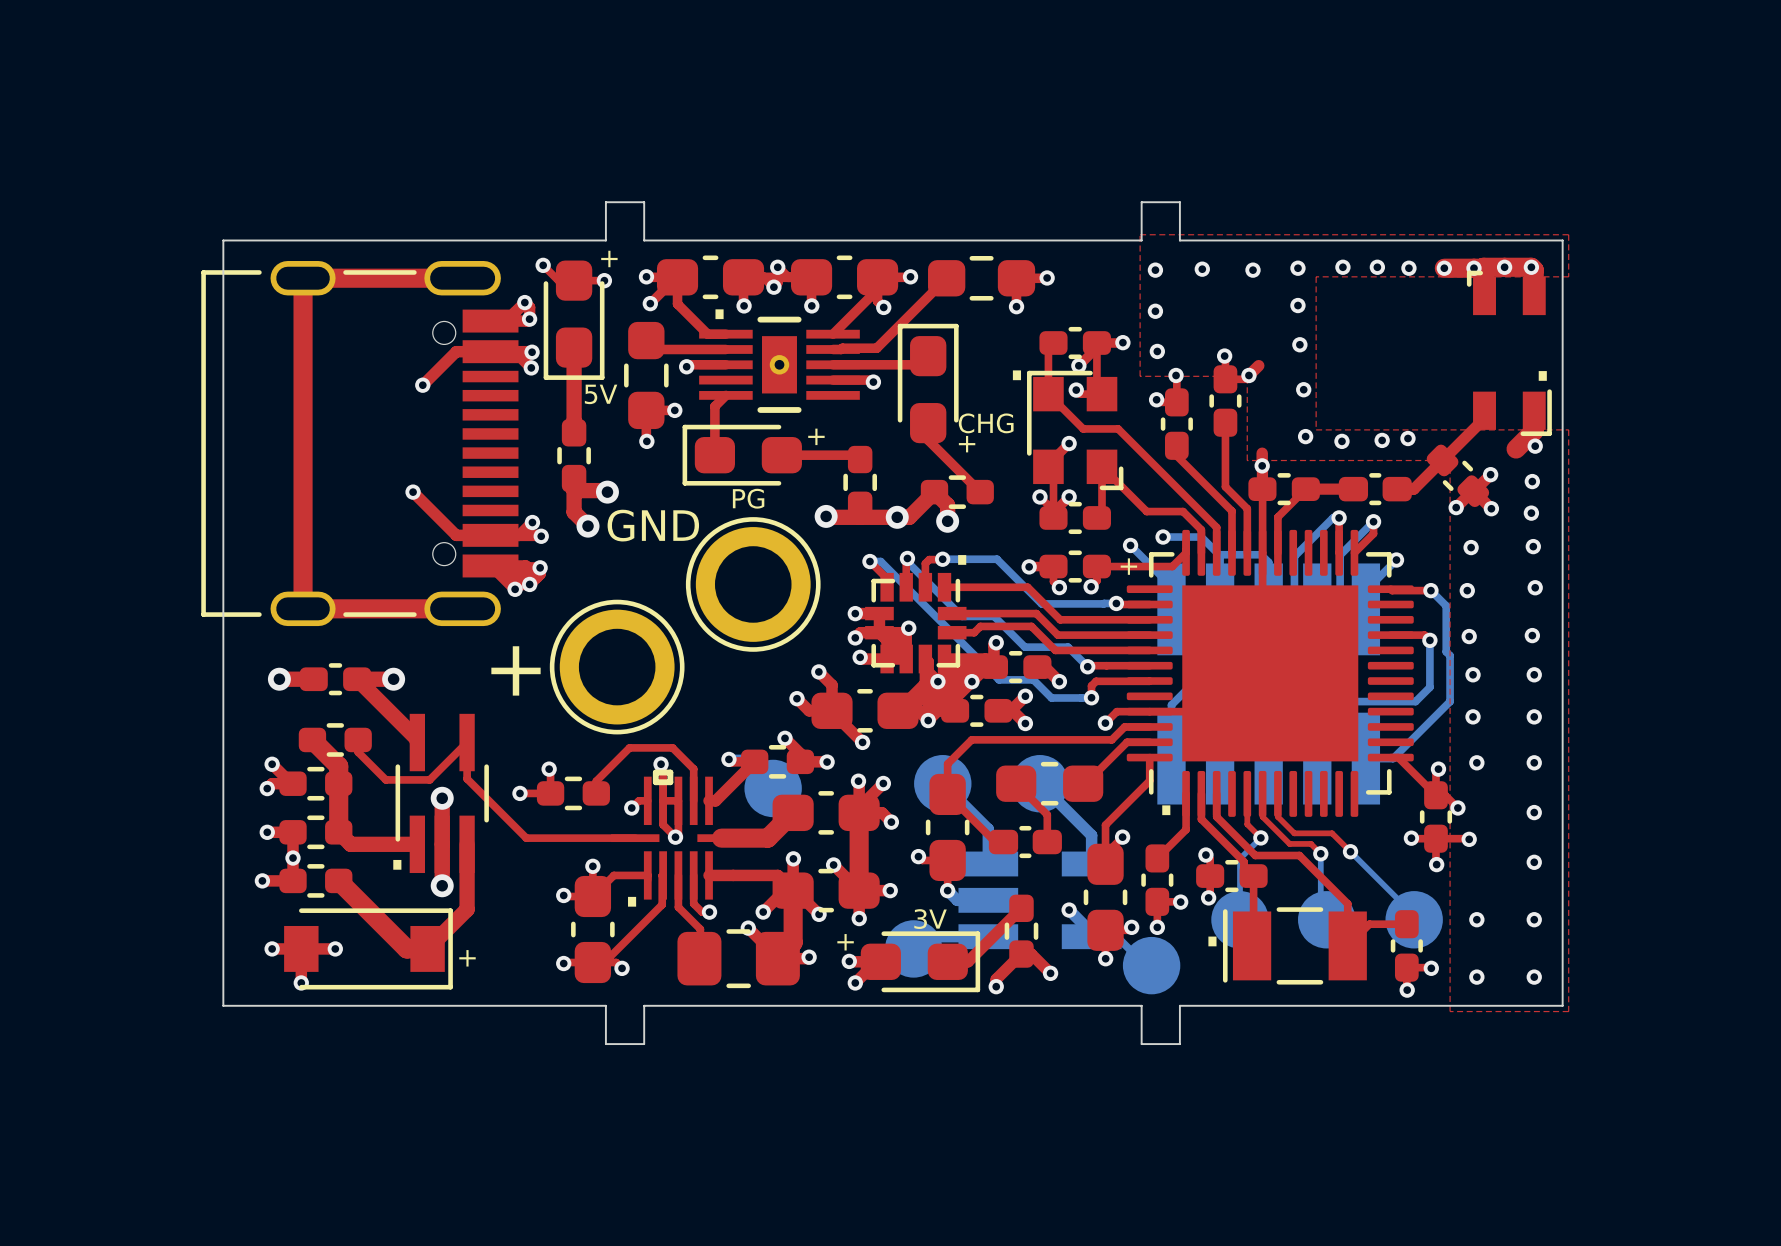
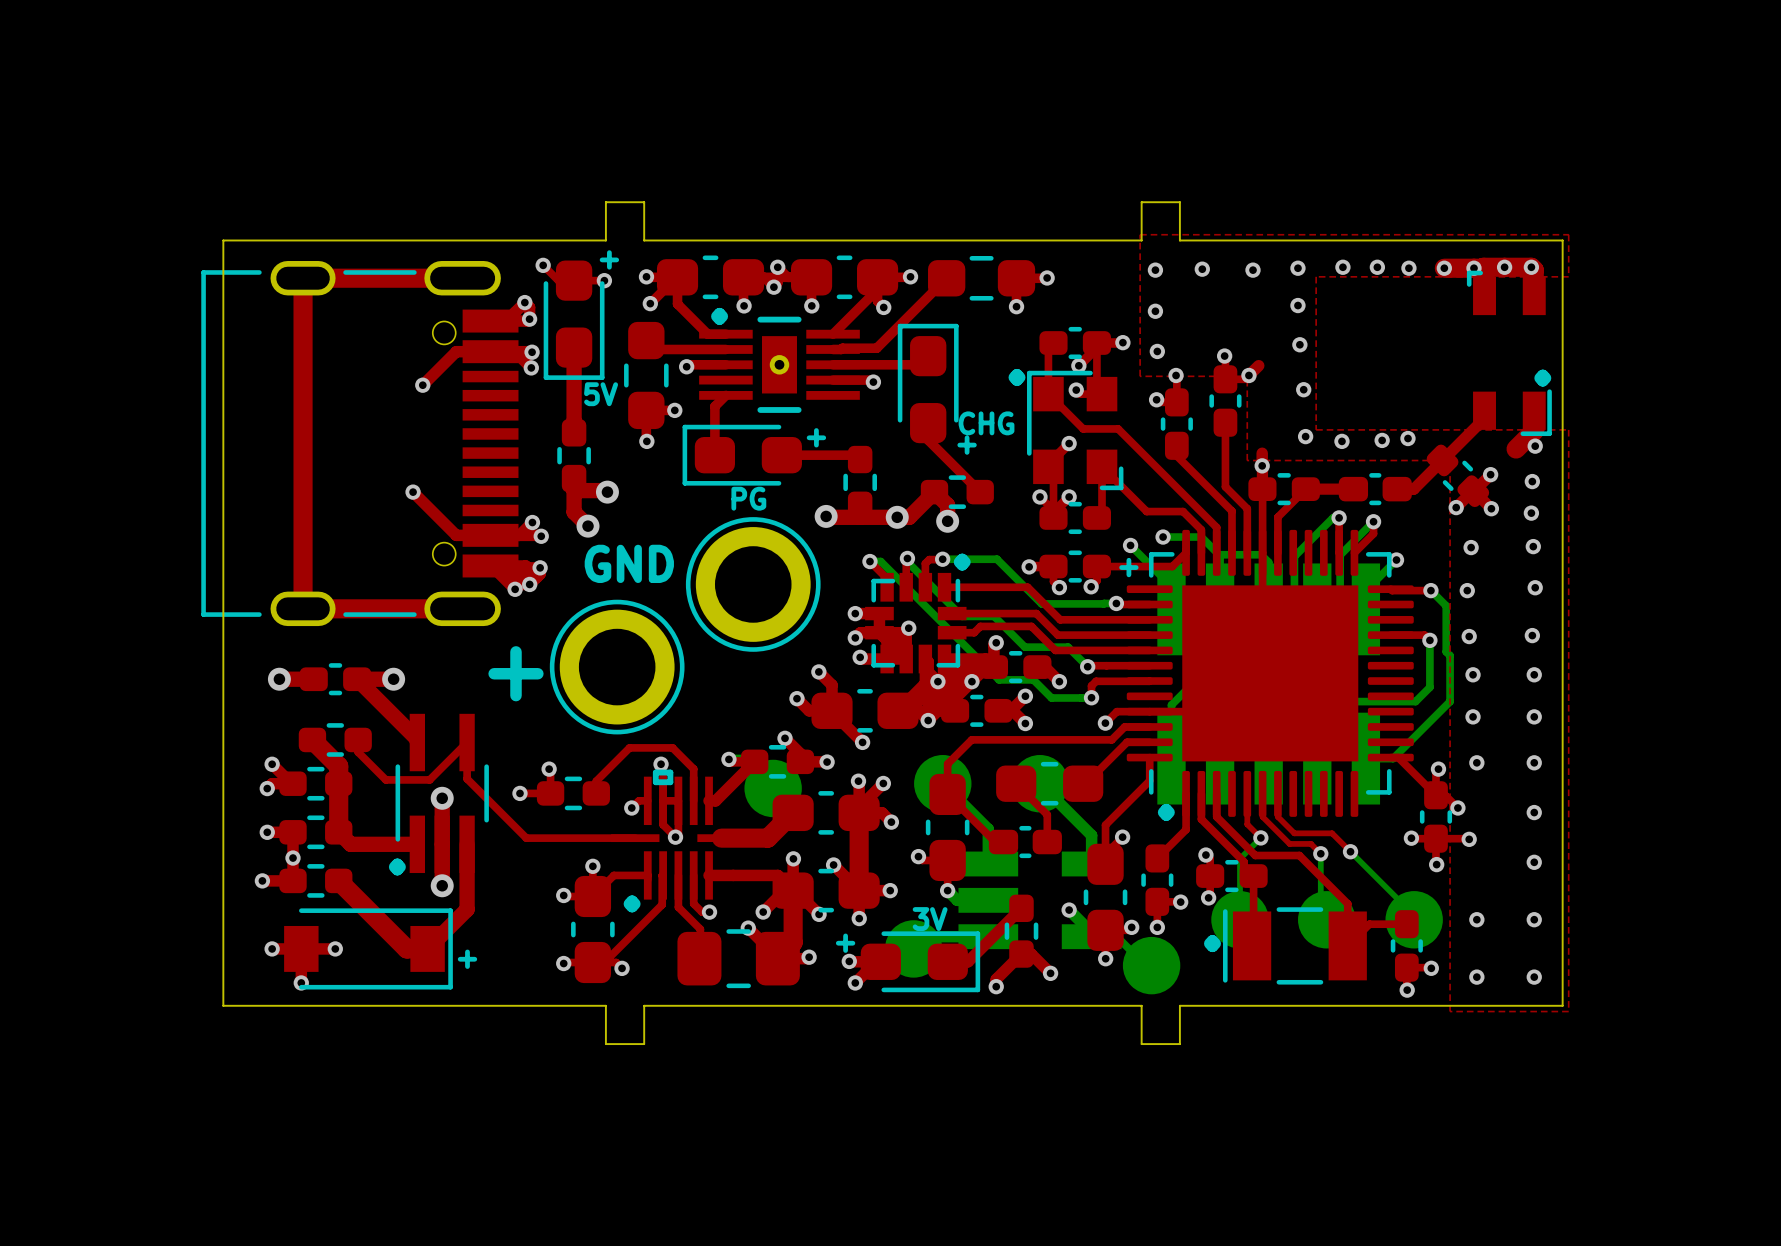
text position: GND (653, 525) -> GND (629, 563)

